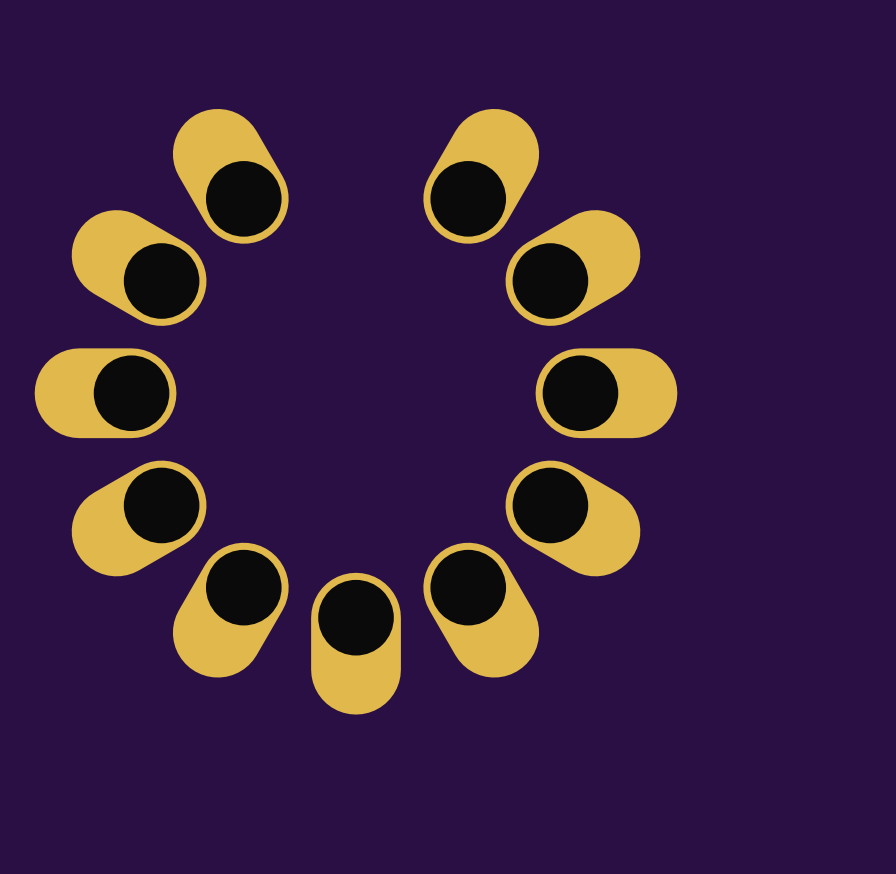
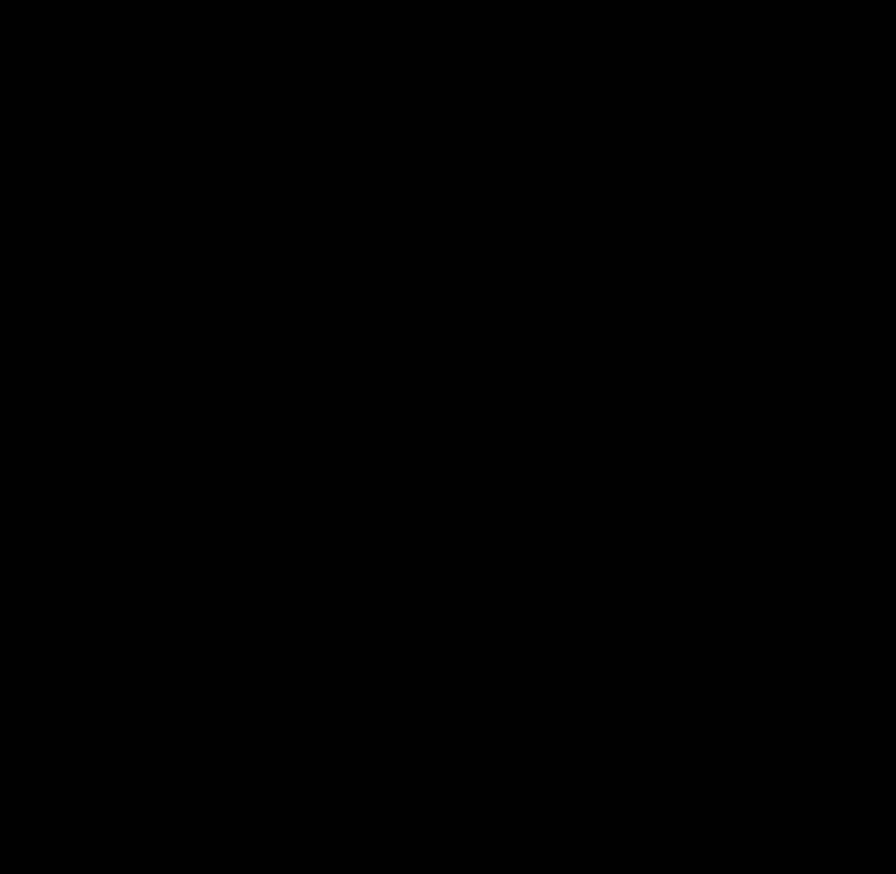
part: (356, 411) -> none

